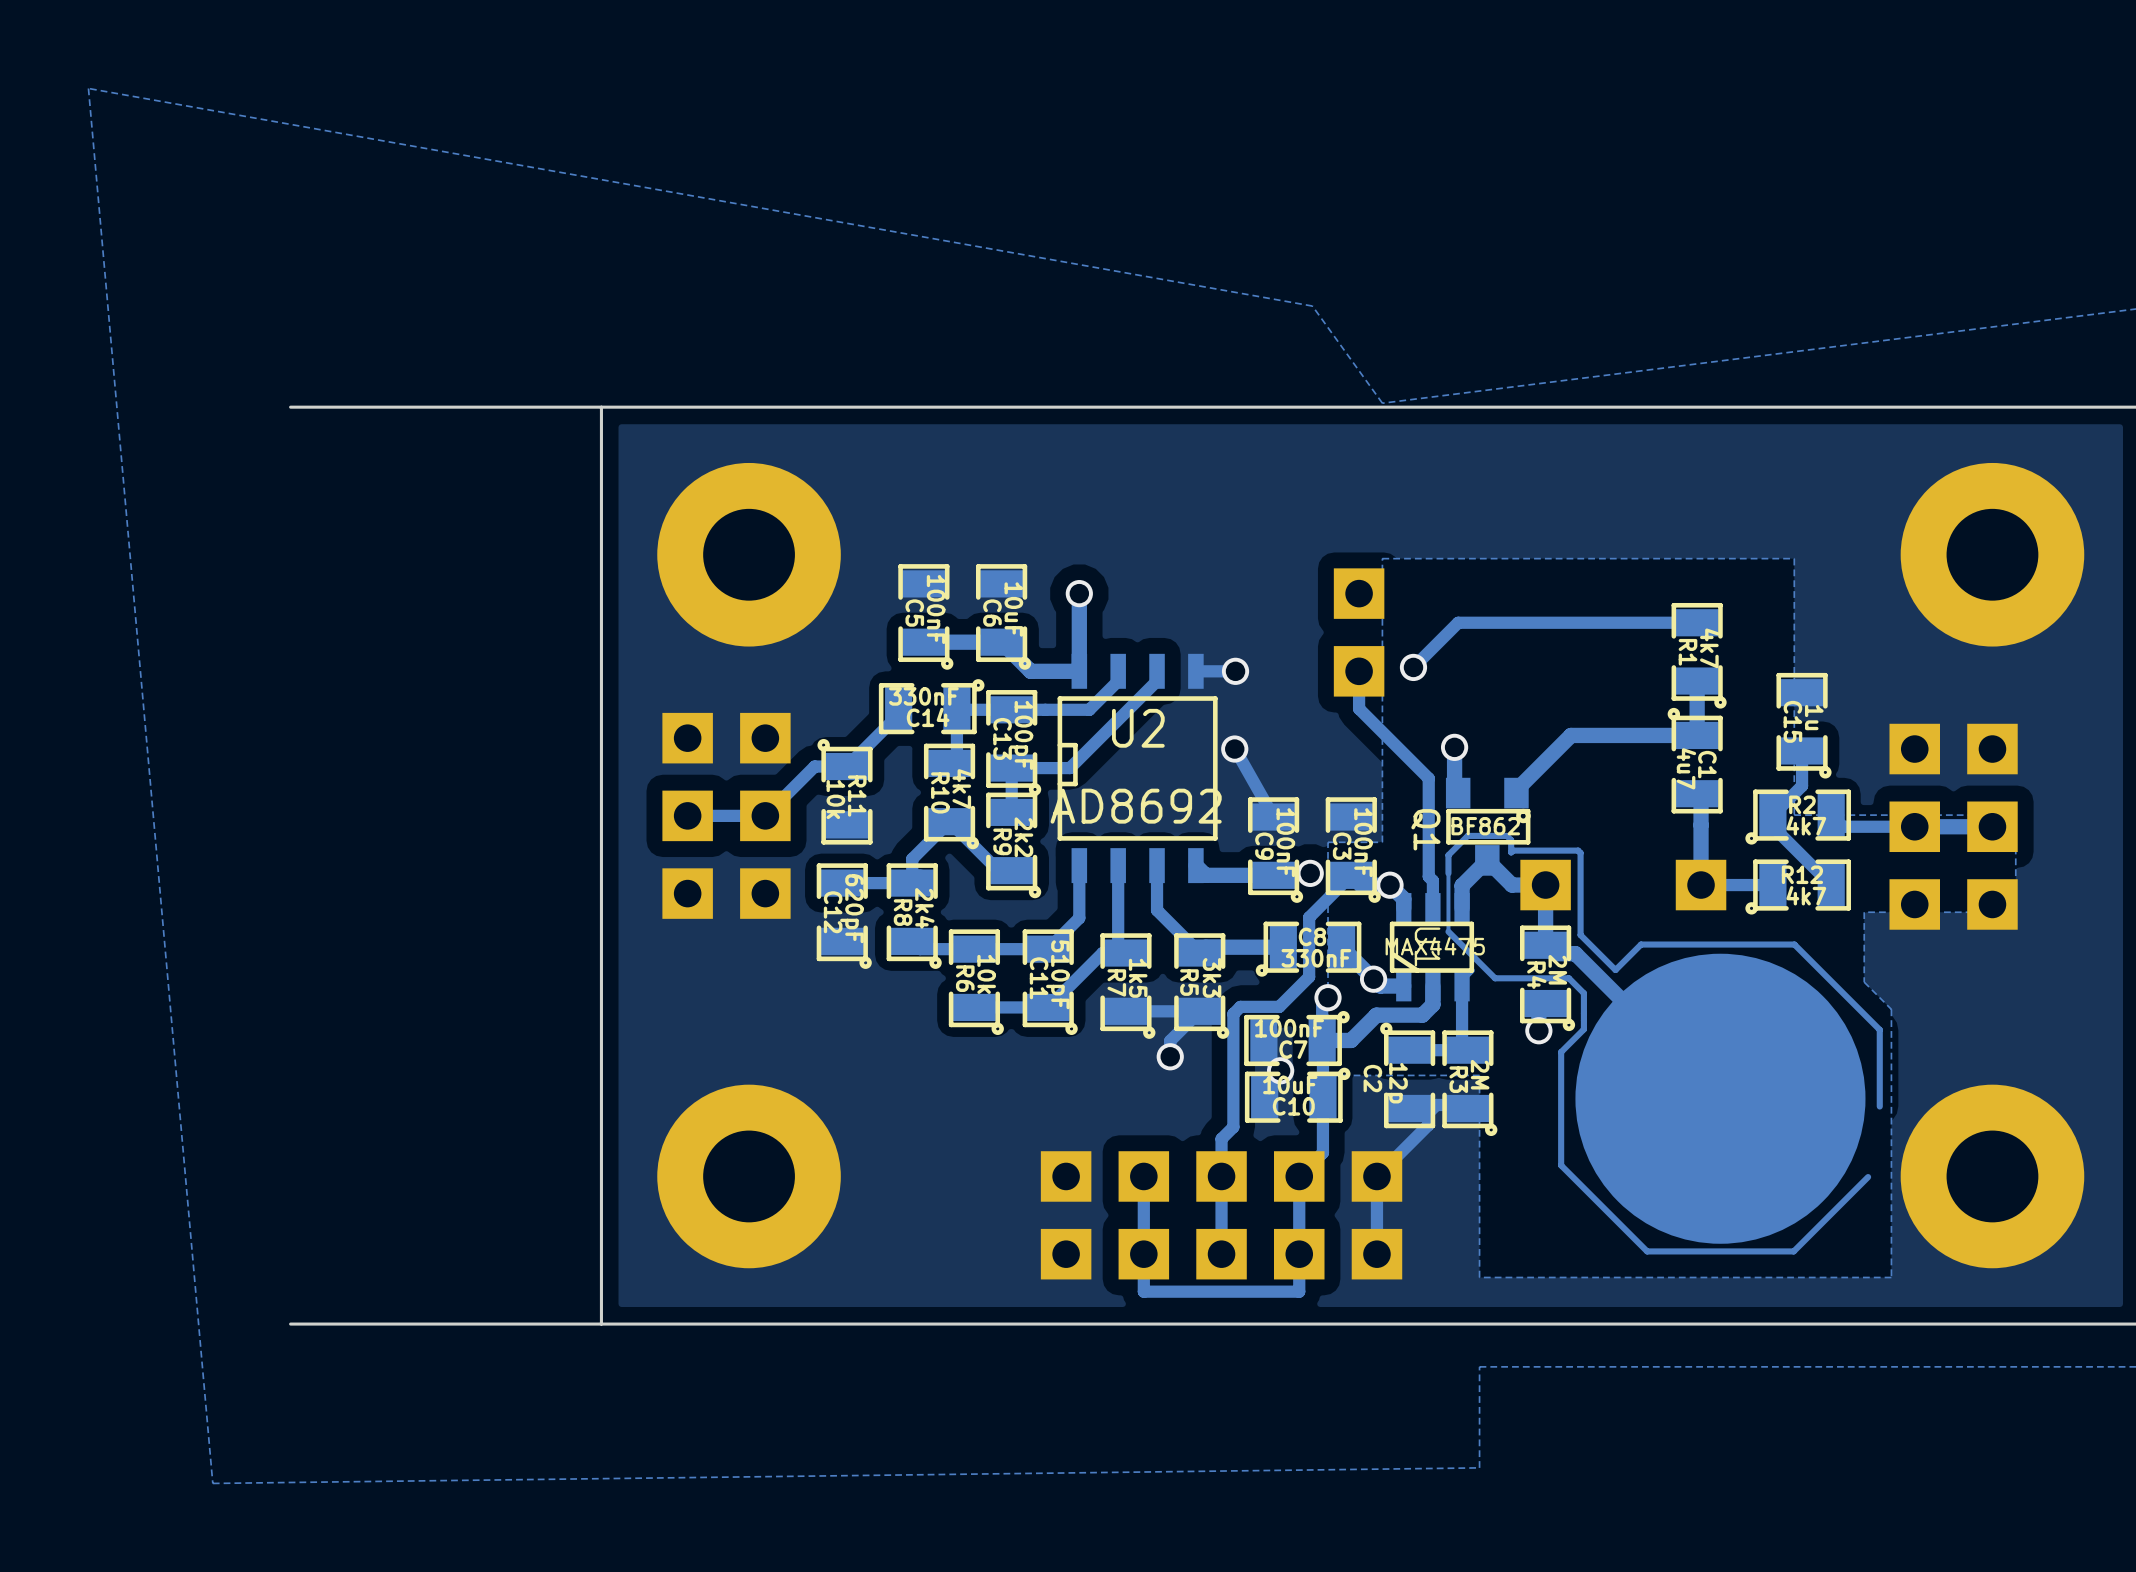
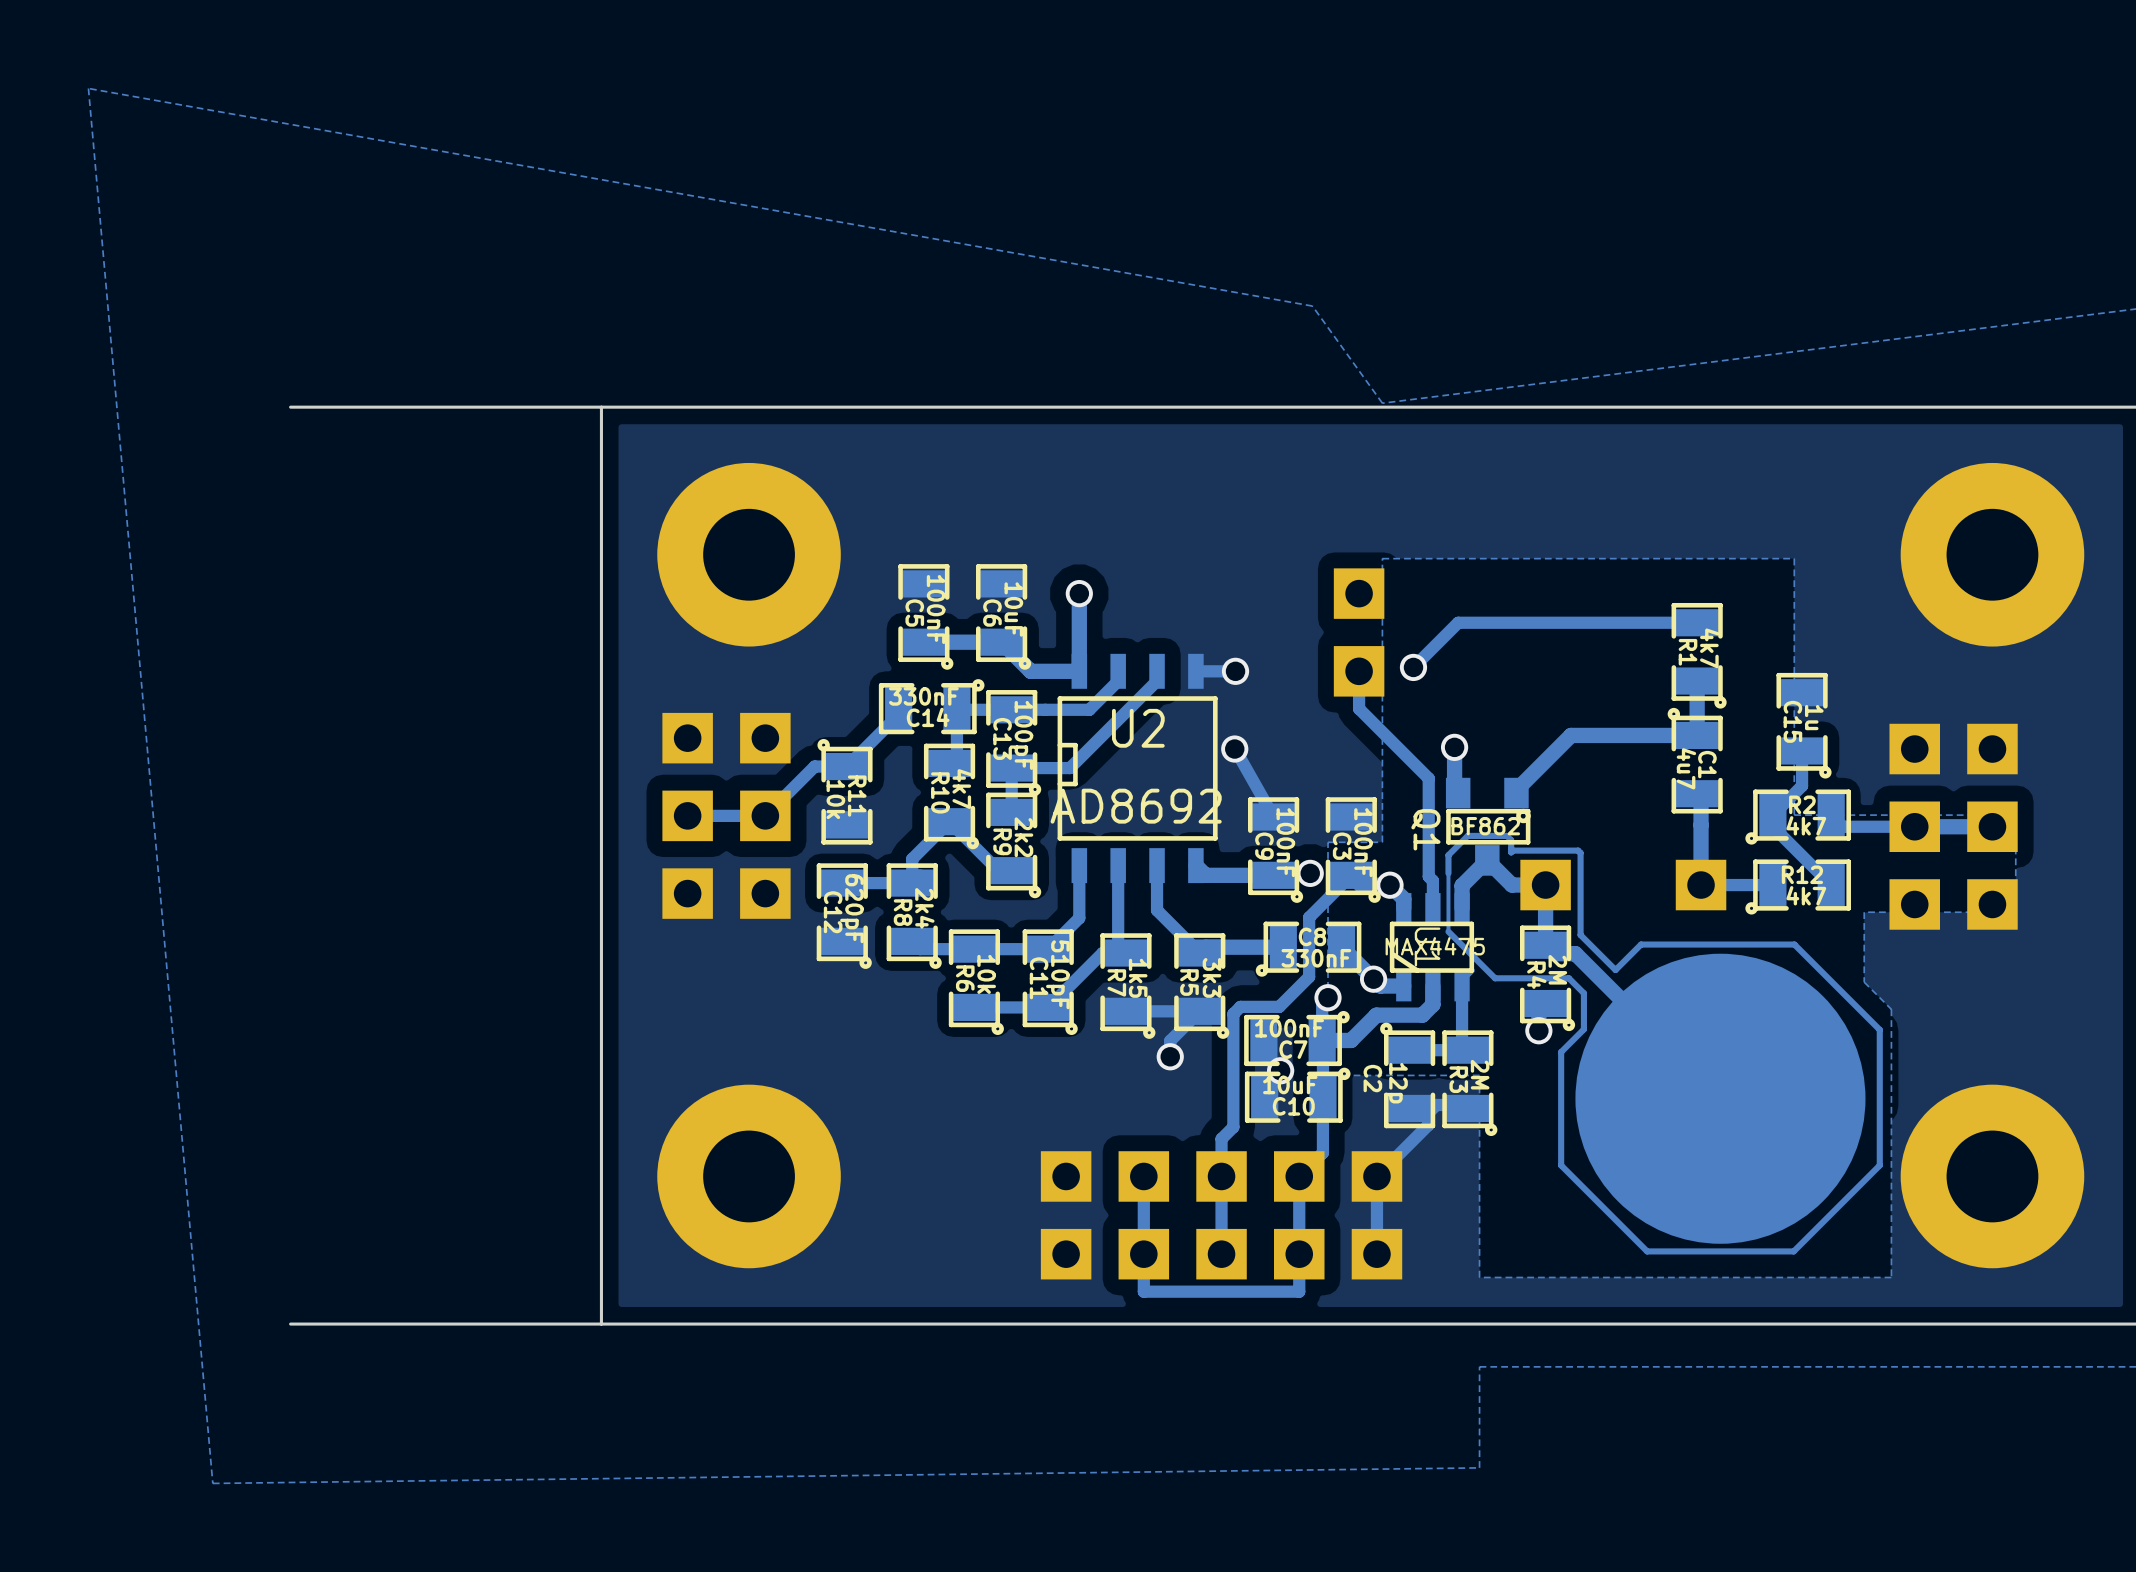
track: none -> (1879, 1106) (1879, 1165) (1868, 1177)

